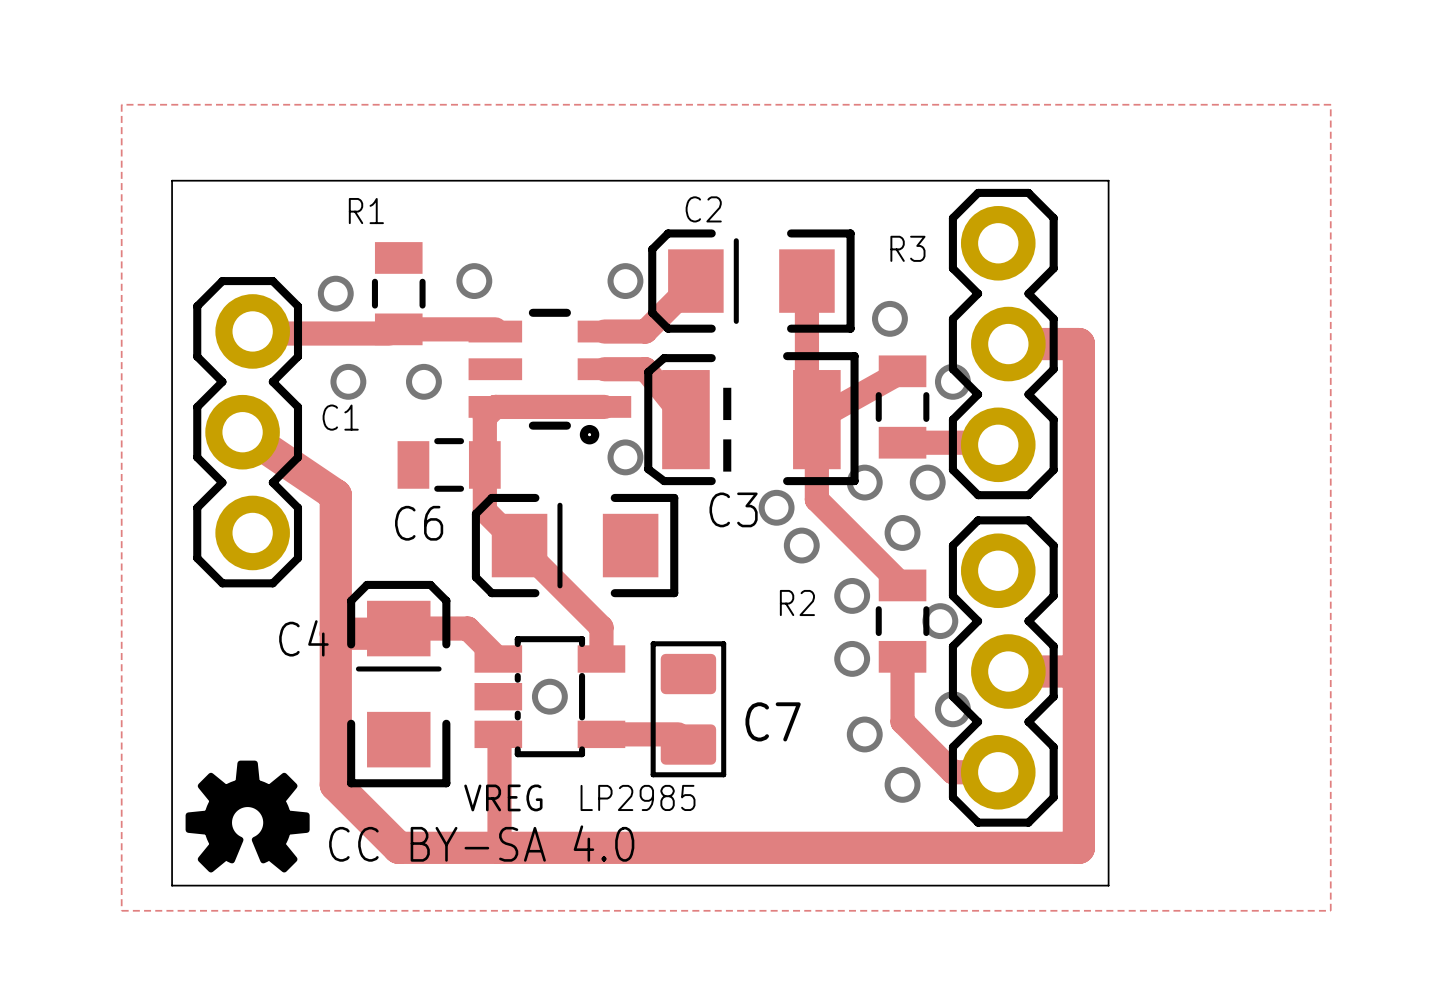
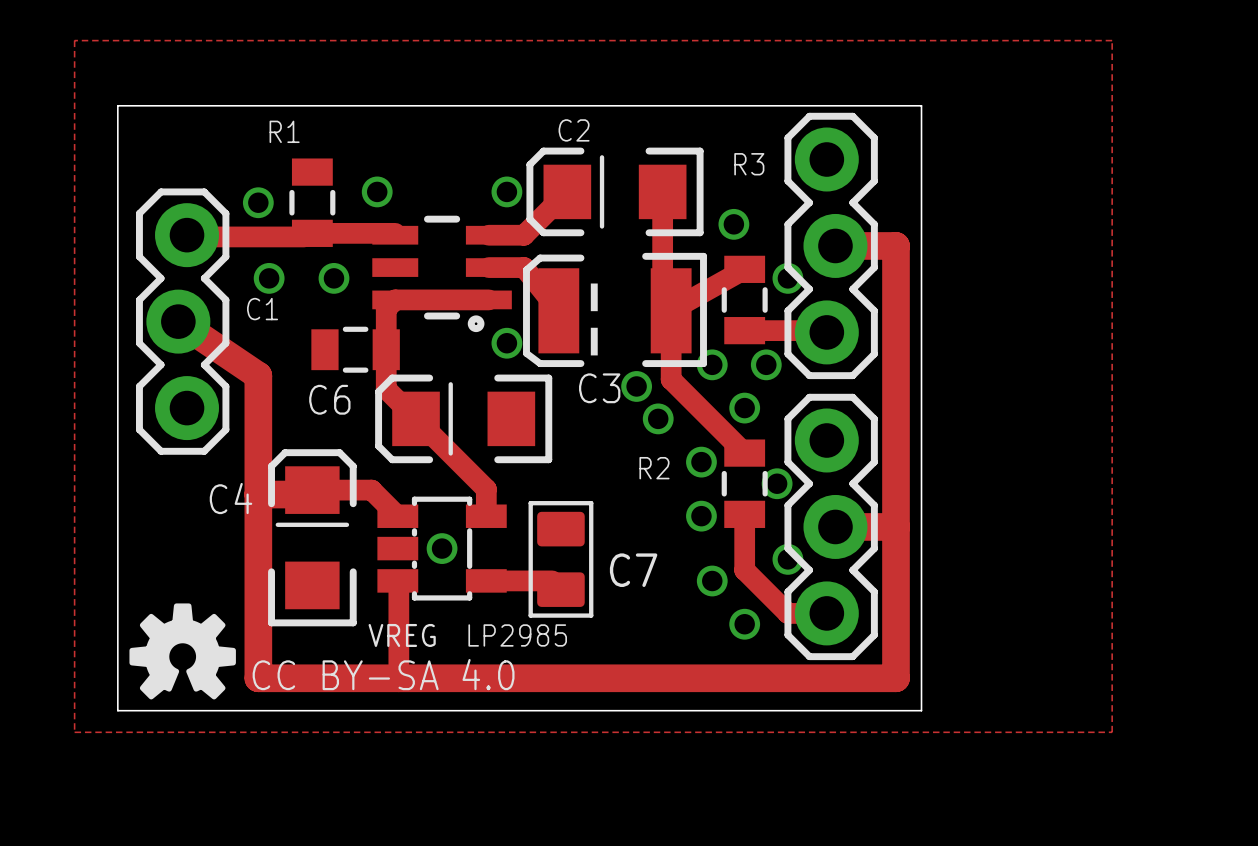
track: (335, 784) (398, 847) -> (258, 624) (258, 678) (312, 678)

